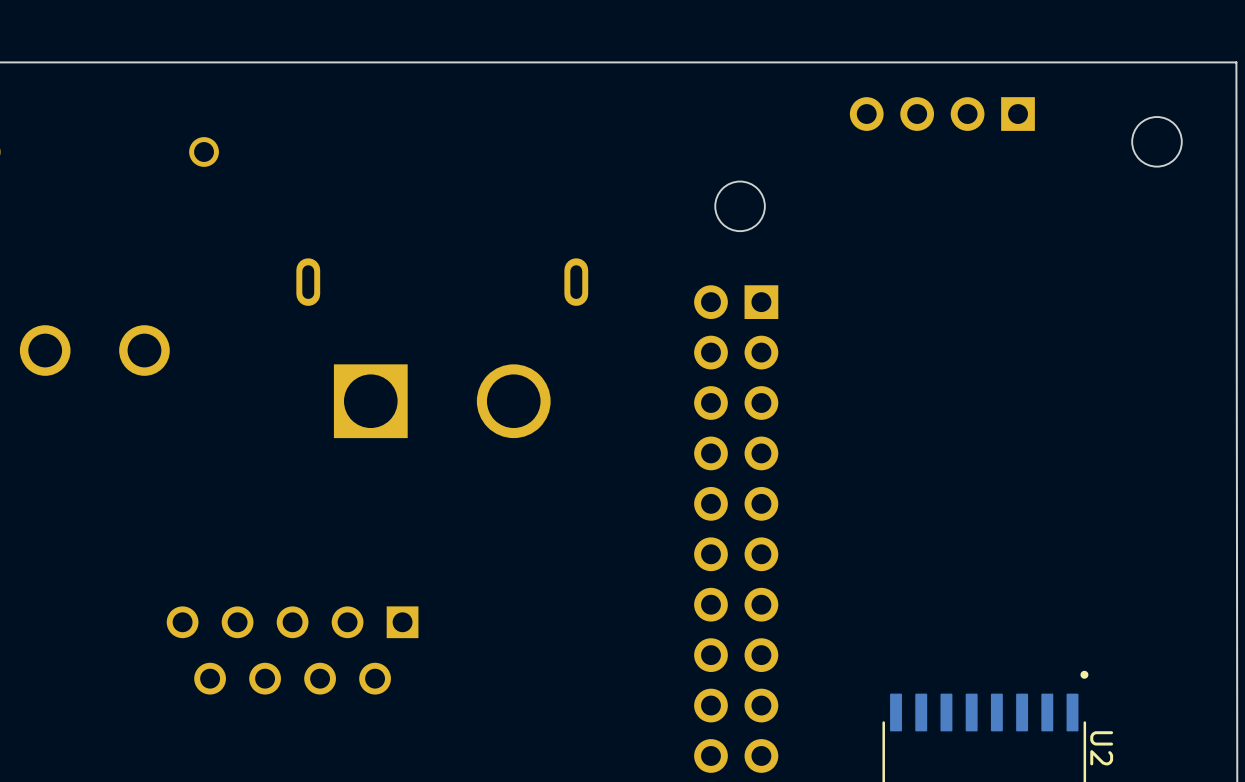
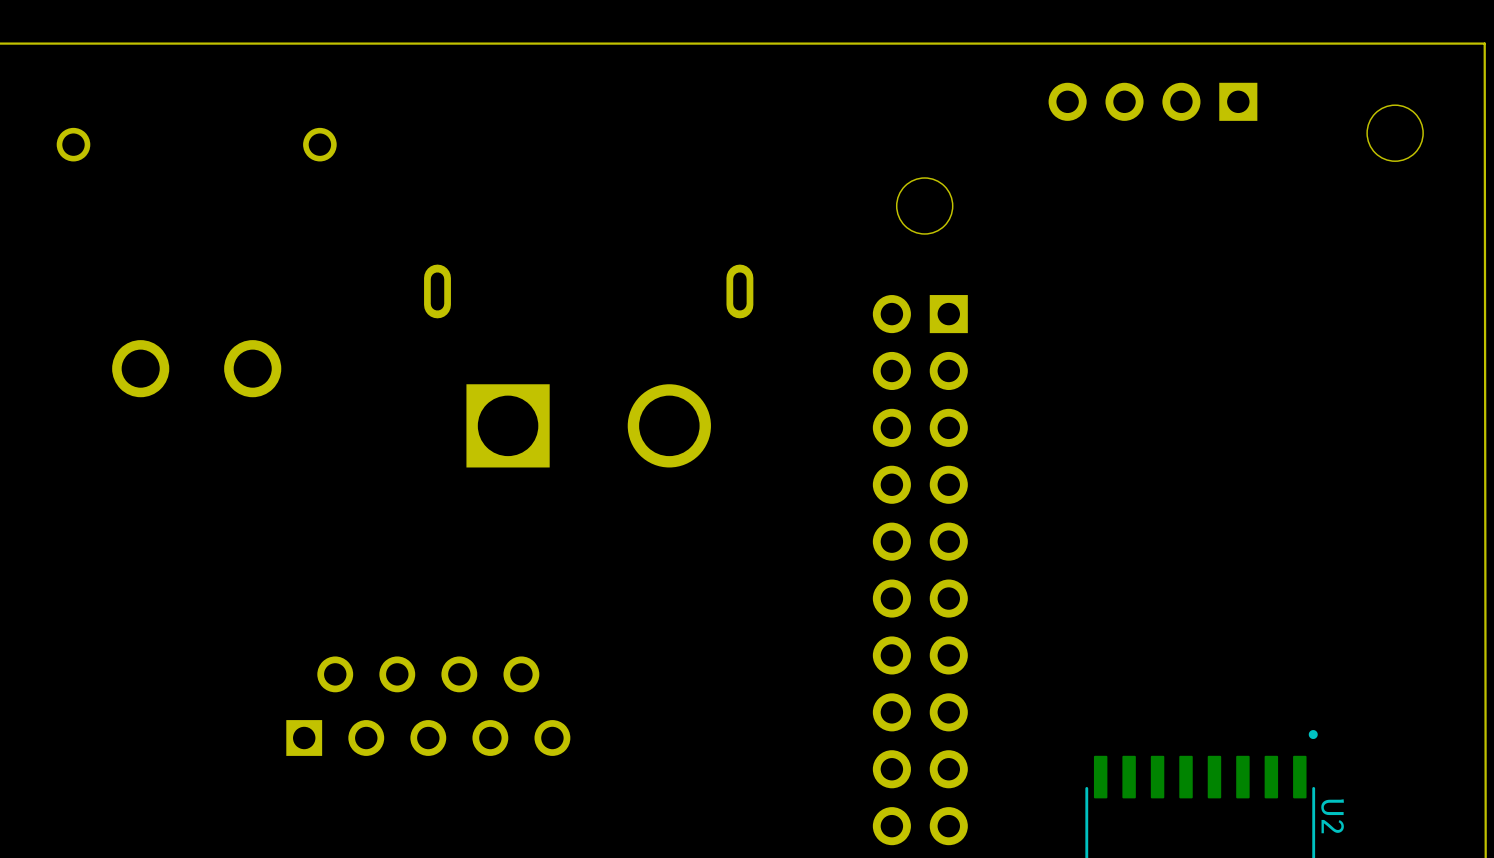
part rotation: 0° (292, 650) -> 180° (428, 706)

